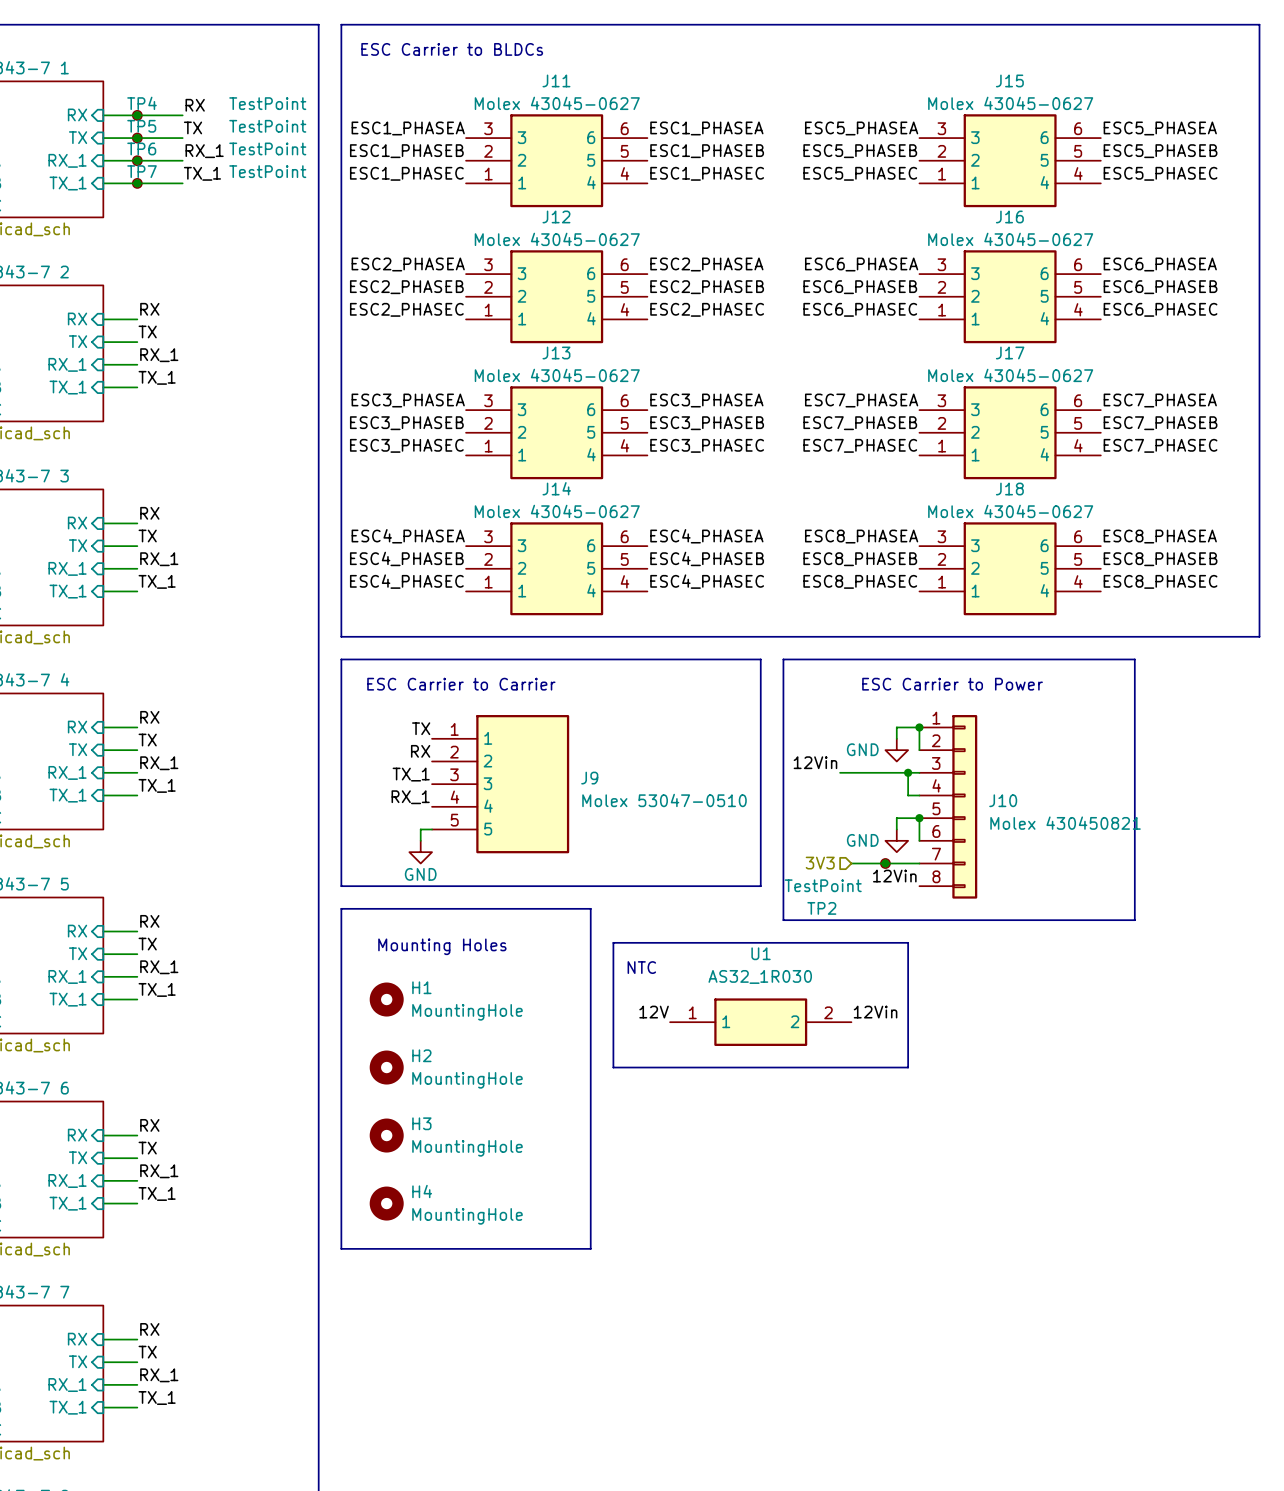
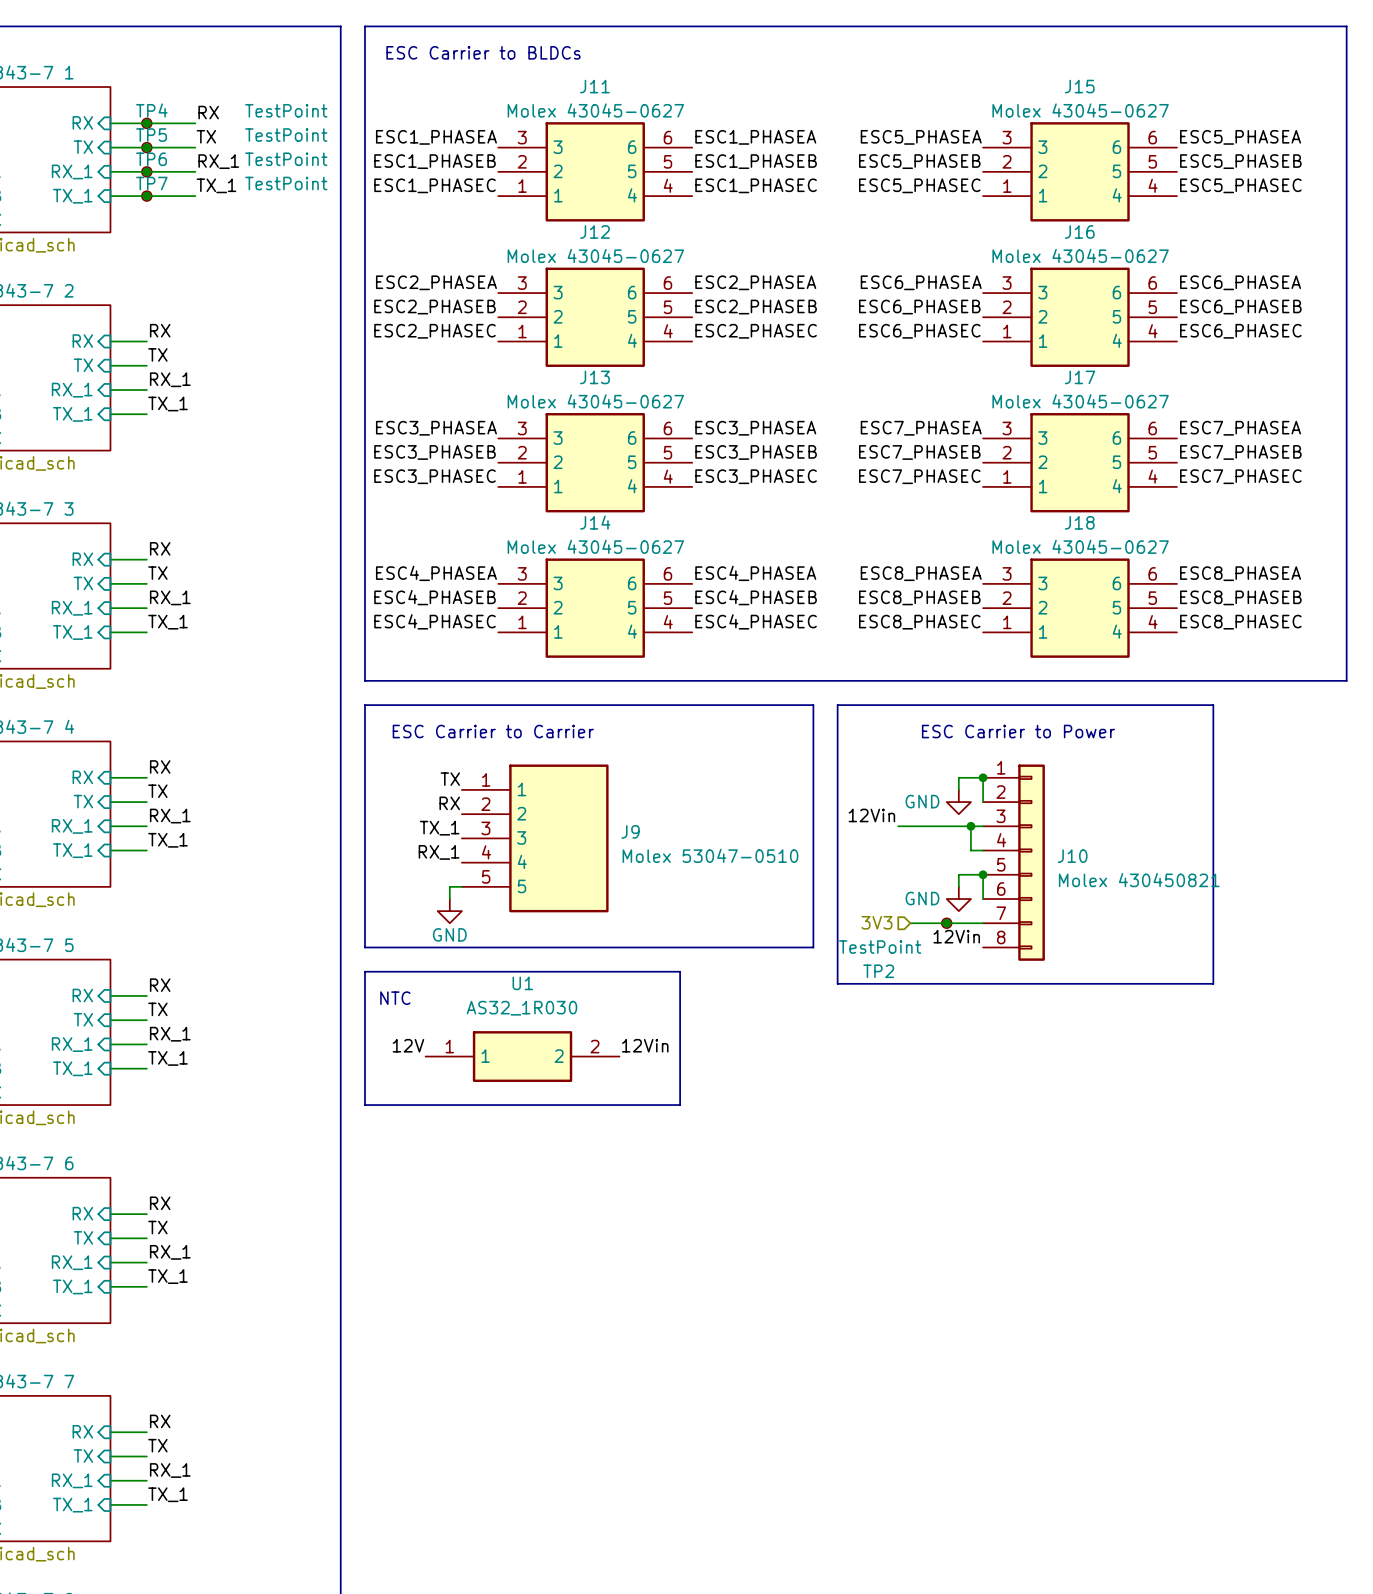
line: (590, 908) (590, 1248) (341, 1248) (341, 1033) -> (631, 971) (680, 971) (680, 1105) (364, 1105)
text: none -> NTC (395, 998)
line: (613, 942) (908, 942) (908, 1067) (613, 1067) (613, 942) -> none
text: Mounting Holes (442, 946) -> none
text: NTC (641, 967) -> none
label: none -> 12V (408, 1045)
label: none -> 12Vin (645, 1045)
H1: MountingHole (386, 999) -> none
label: 12V (654, 1012) -> none
label: 12Vin (875, 1012) -> none
U1 position: (760, 1022) -> (522, 1056)
H2: MountingHole (386, 1067) -> none
H3: MountingHole (386, 1135) -> none
H4: MountingHole (386, 1203) -> none

